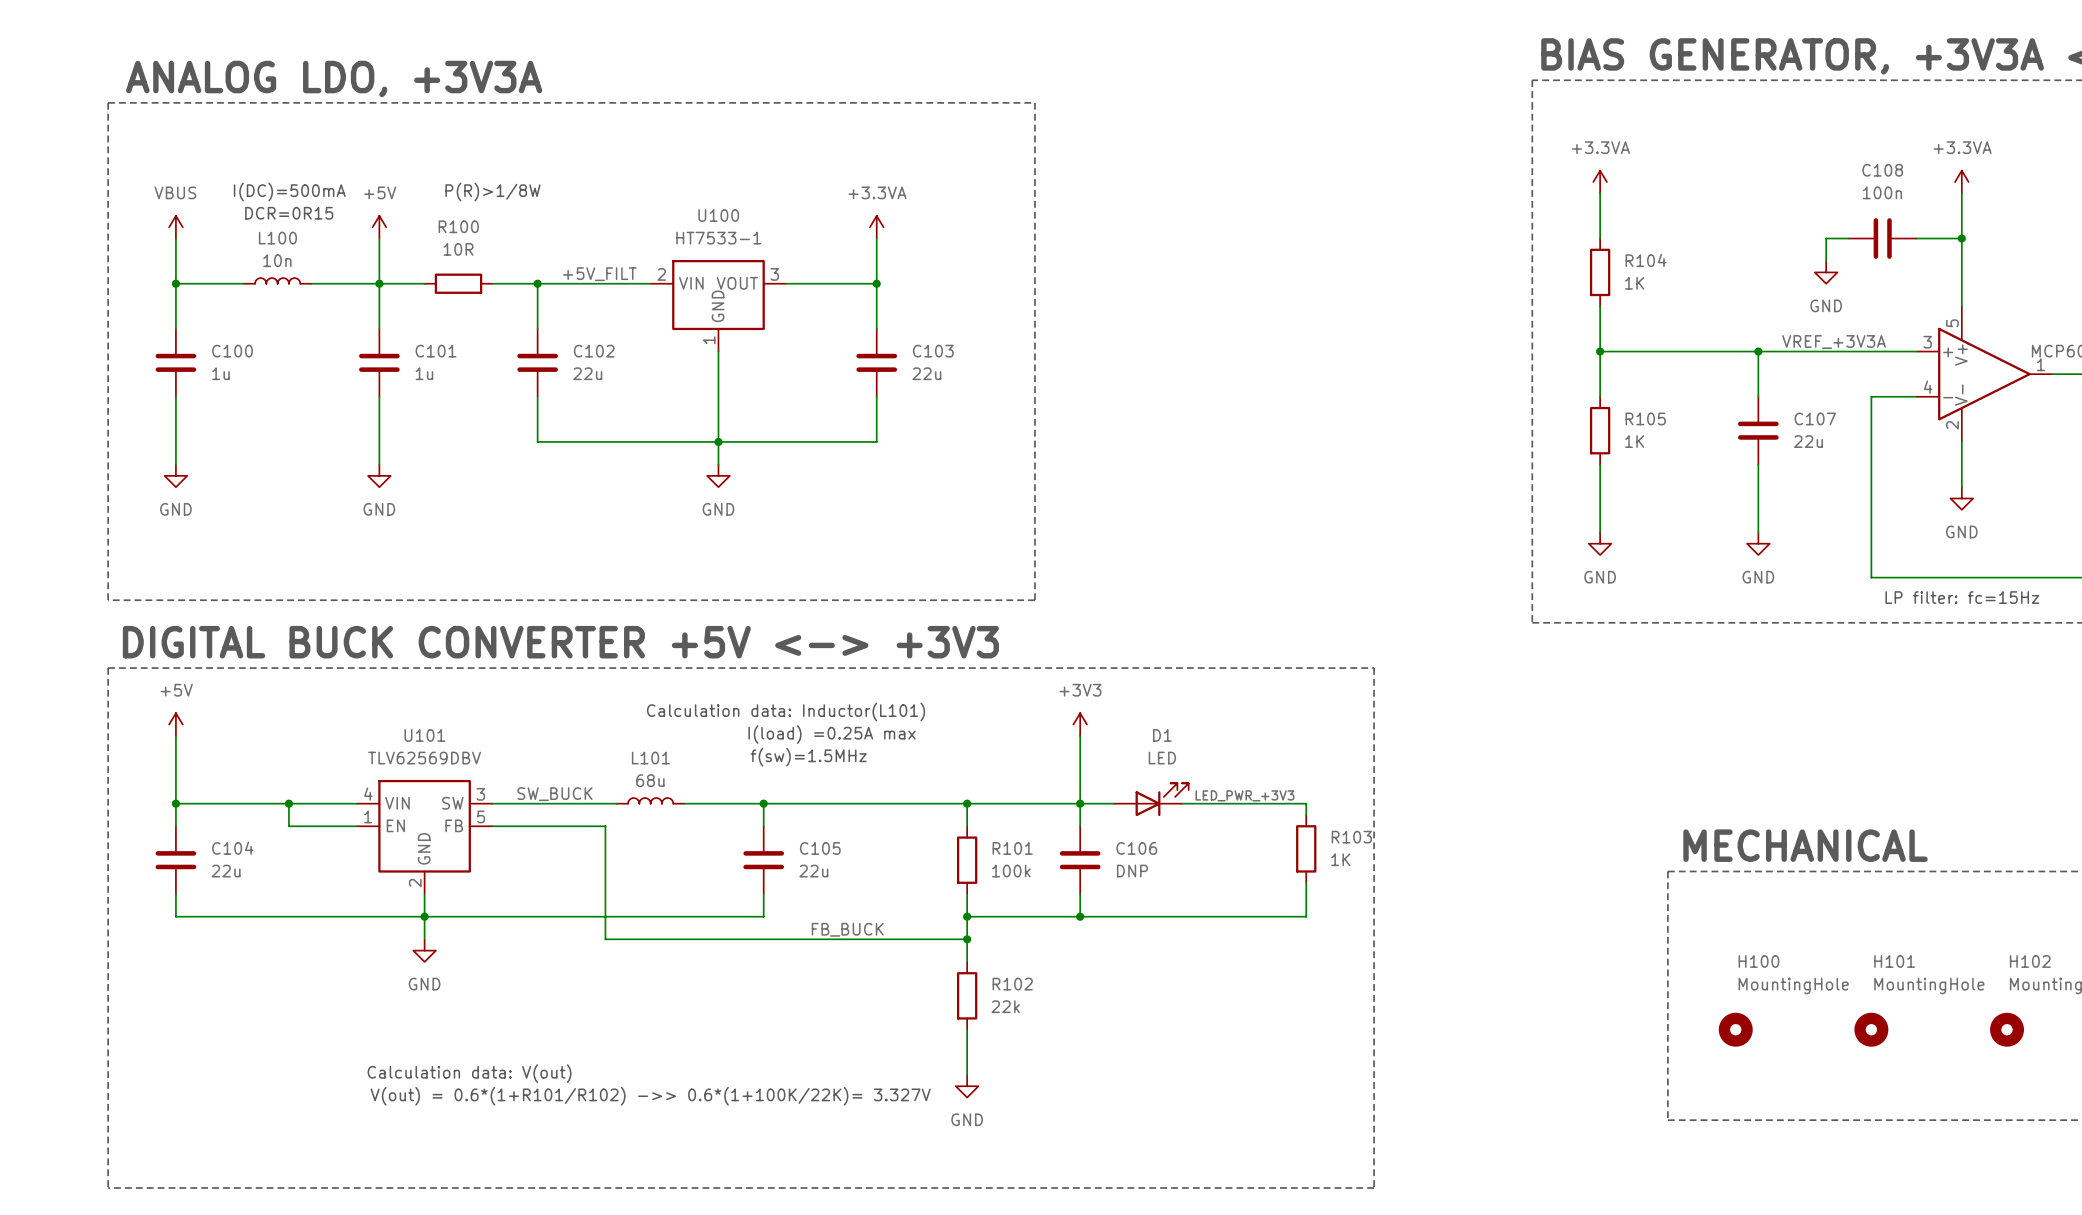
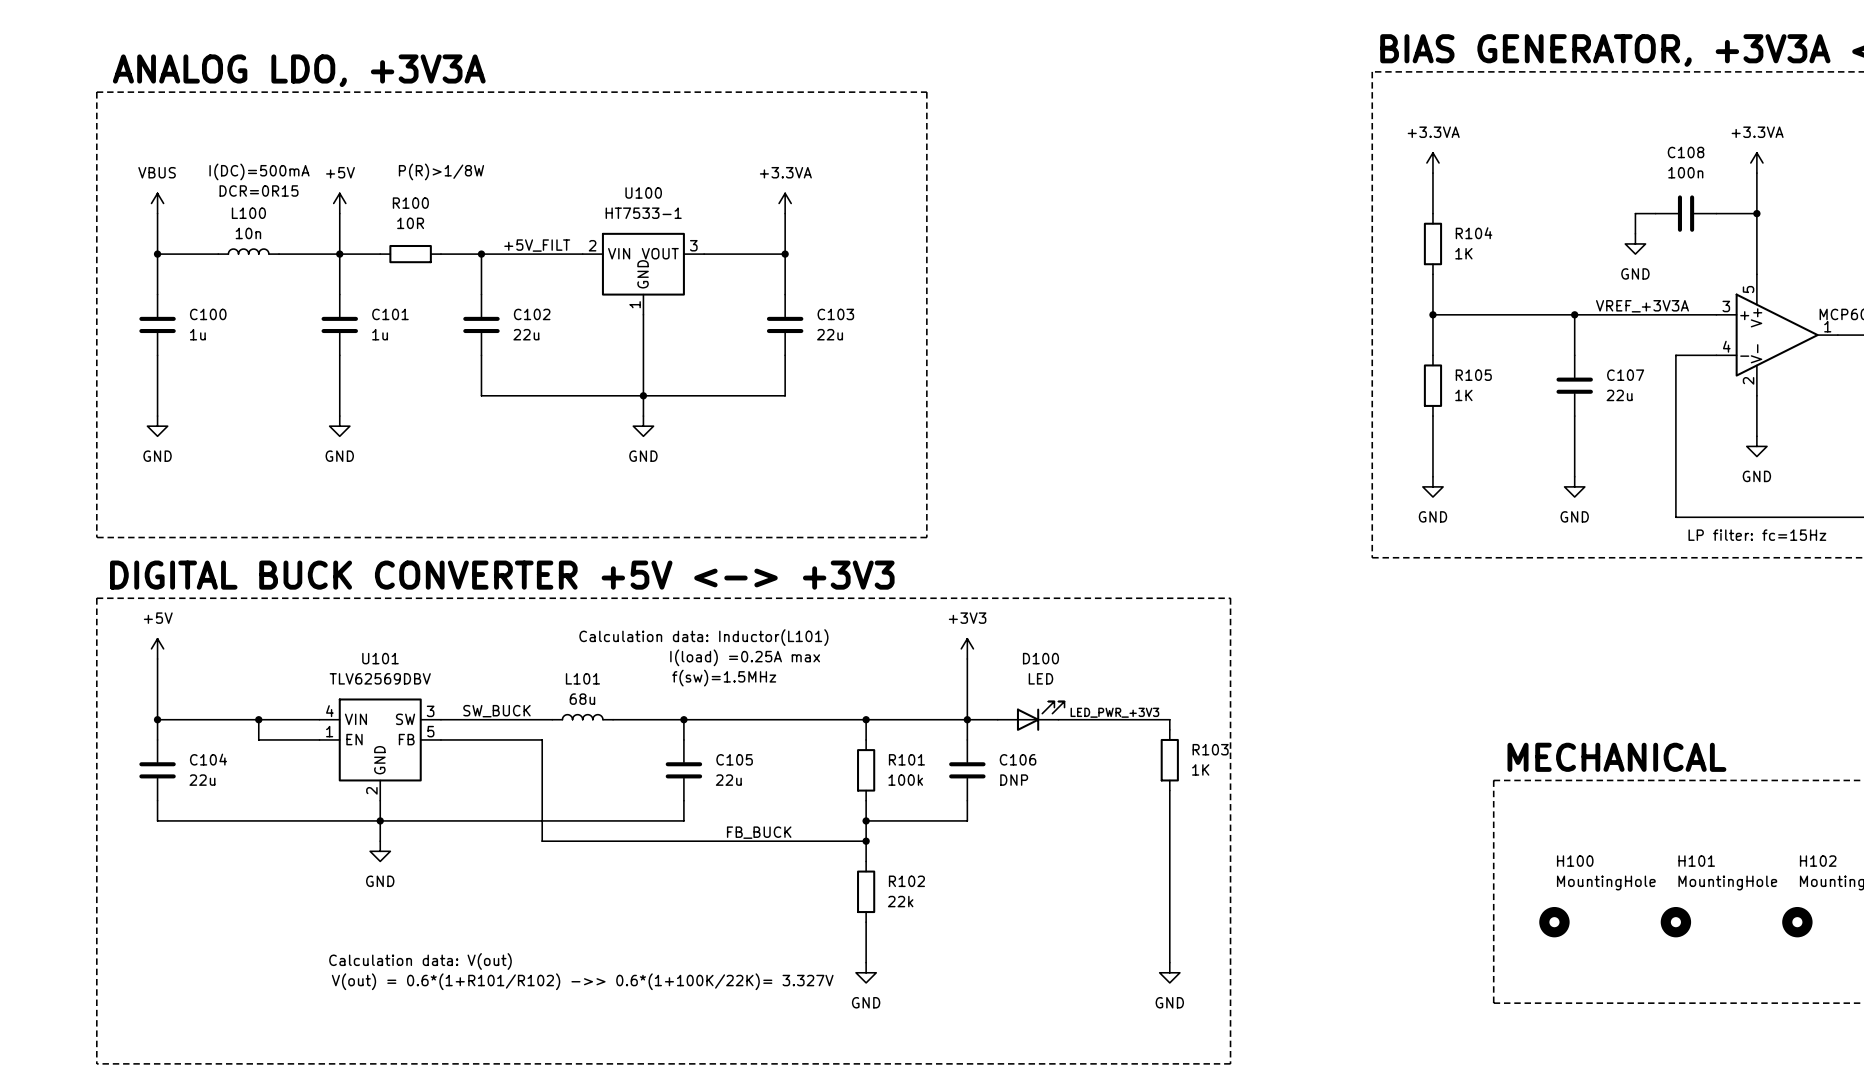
D1 name: D1 (1162, 735) -> D100 (1040, 658)
wire: (1080, 916) (1306, 916) -> (1169, 962) (1169, 820)
junction: (1080, 916) -> none
power symbol: none -> GND (1169, 972)

